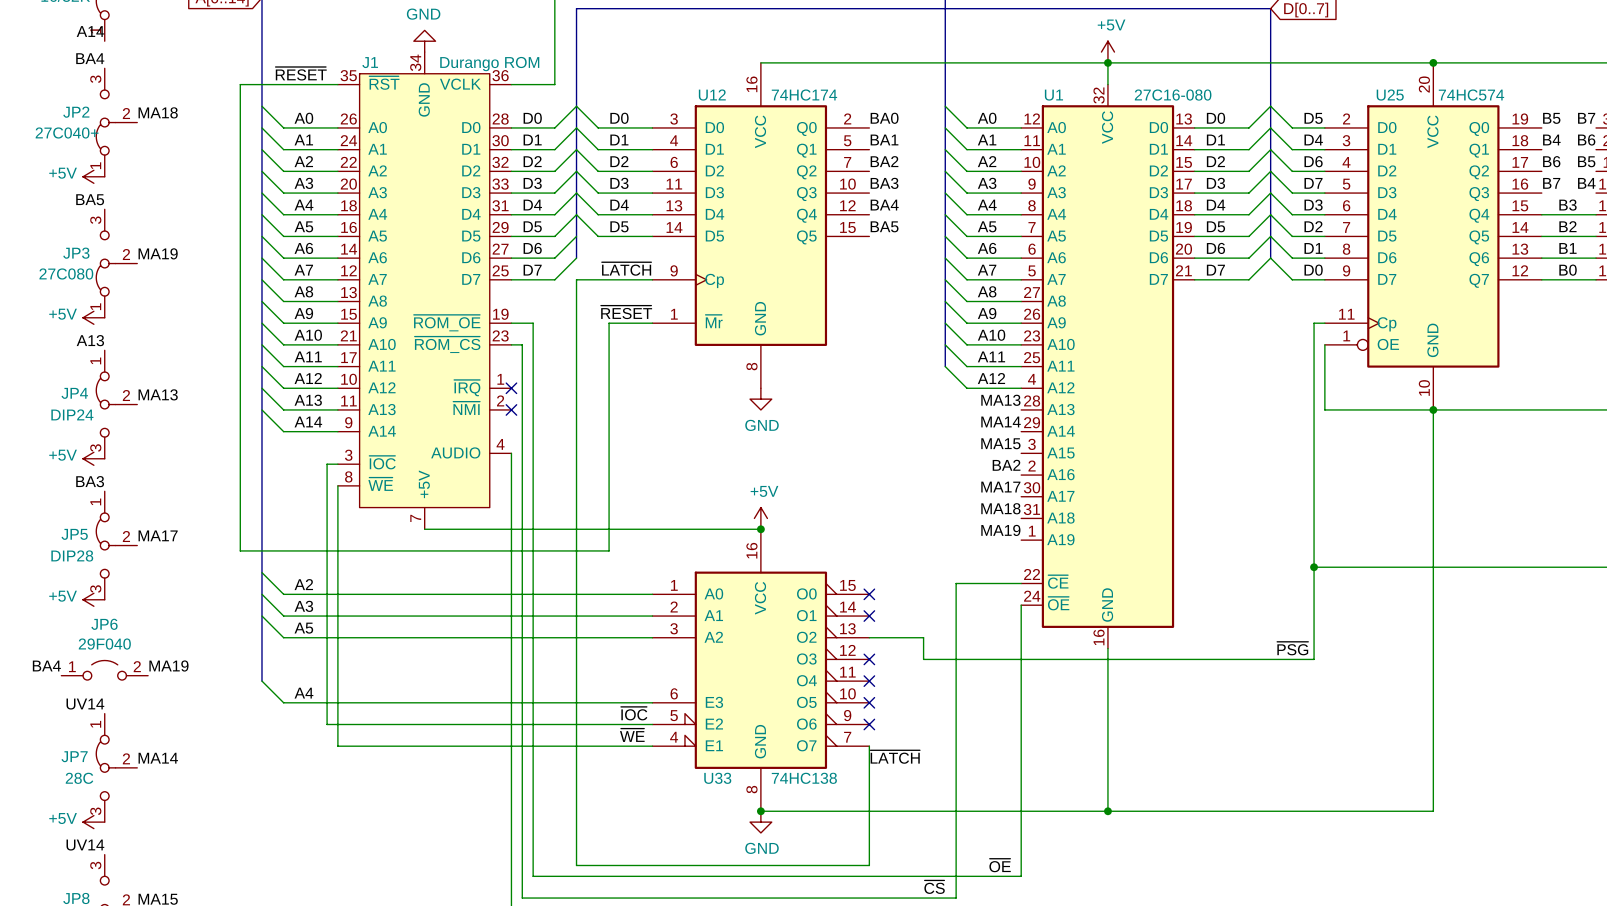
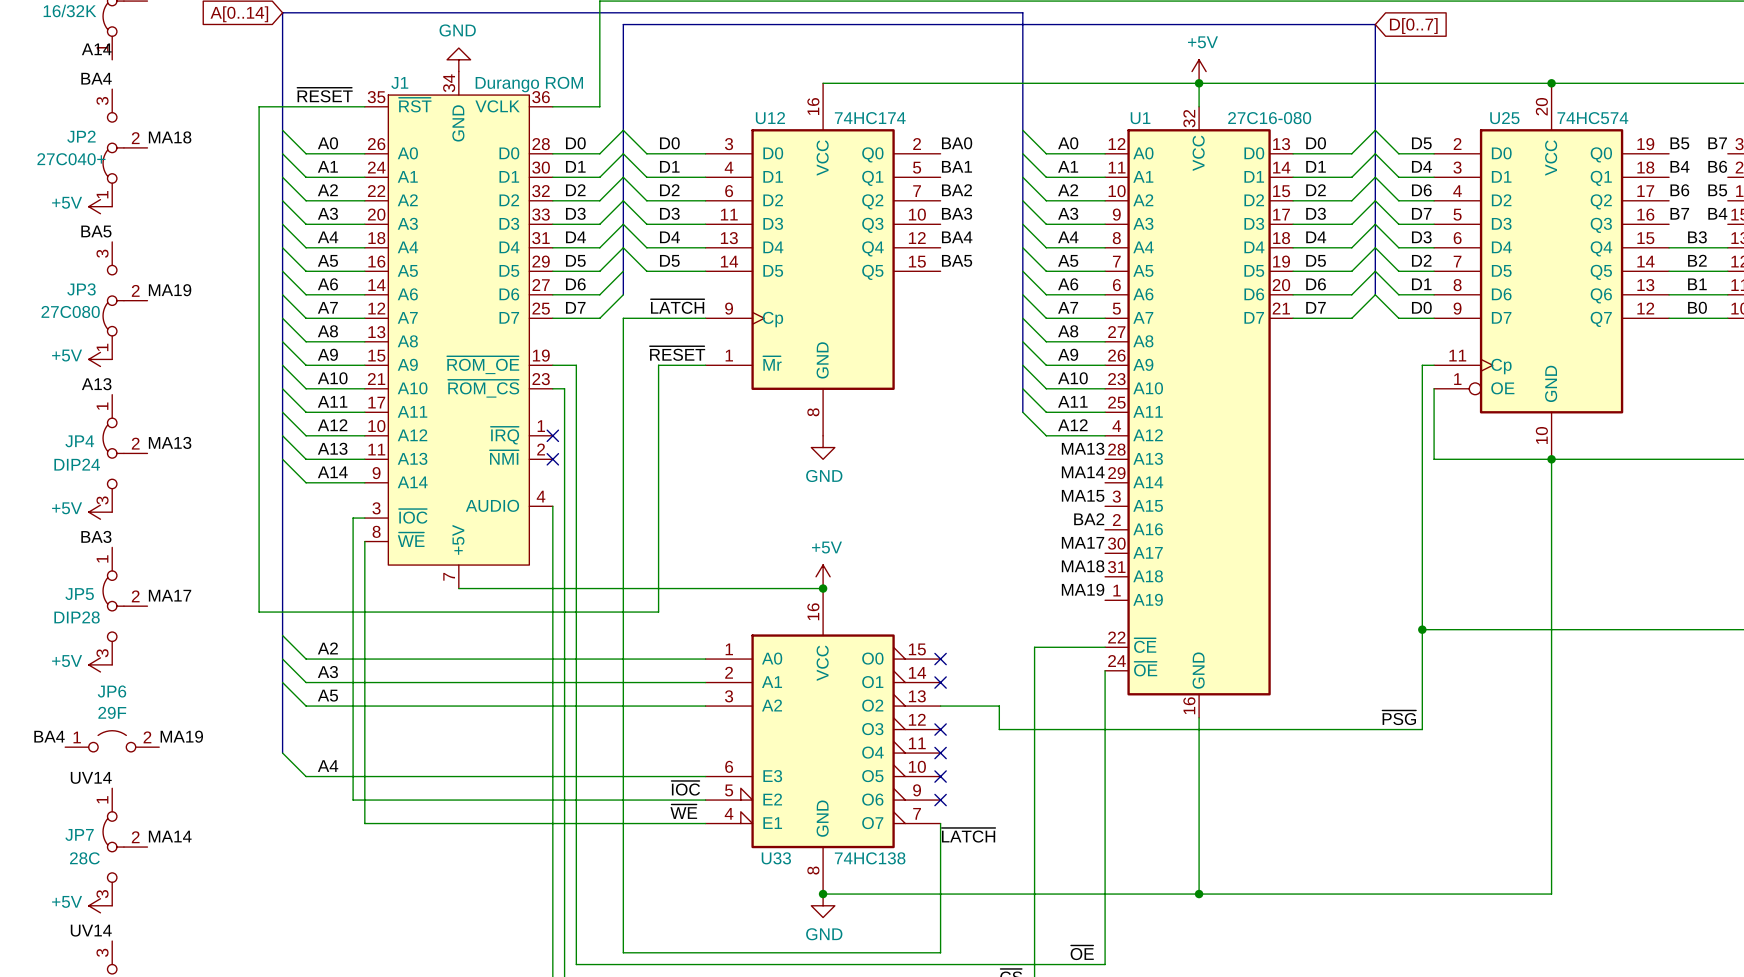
JP6 value: 29F040 (104, 644) -> 29F (112, 712)

